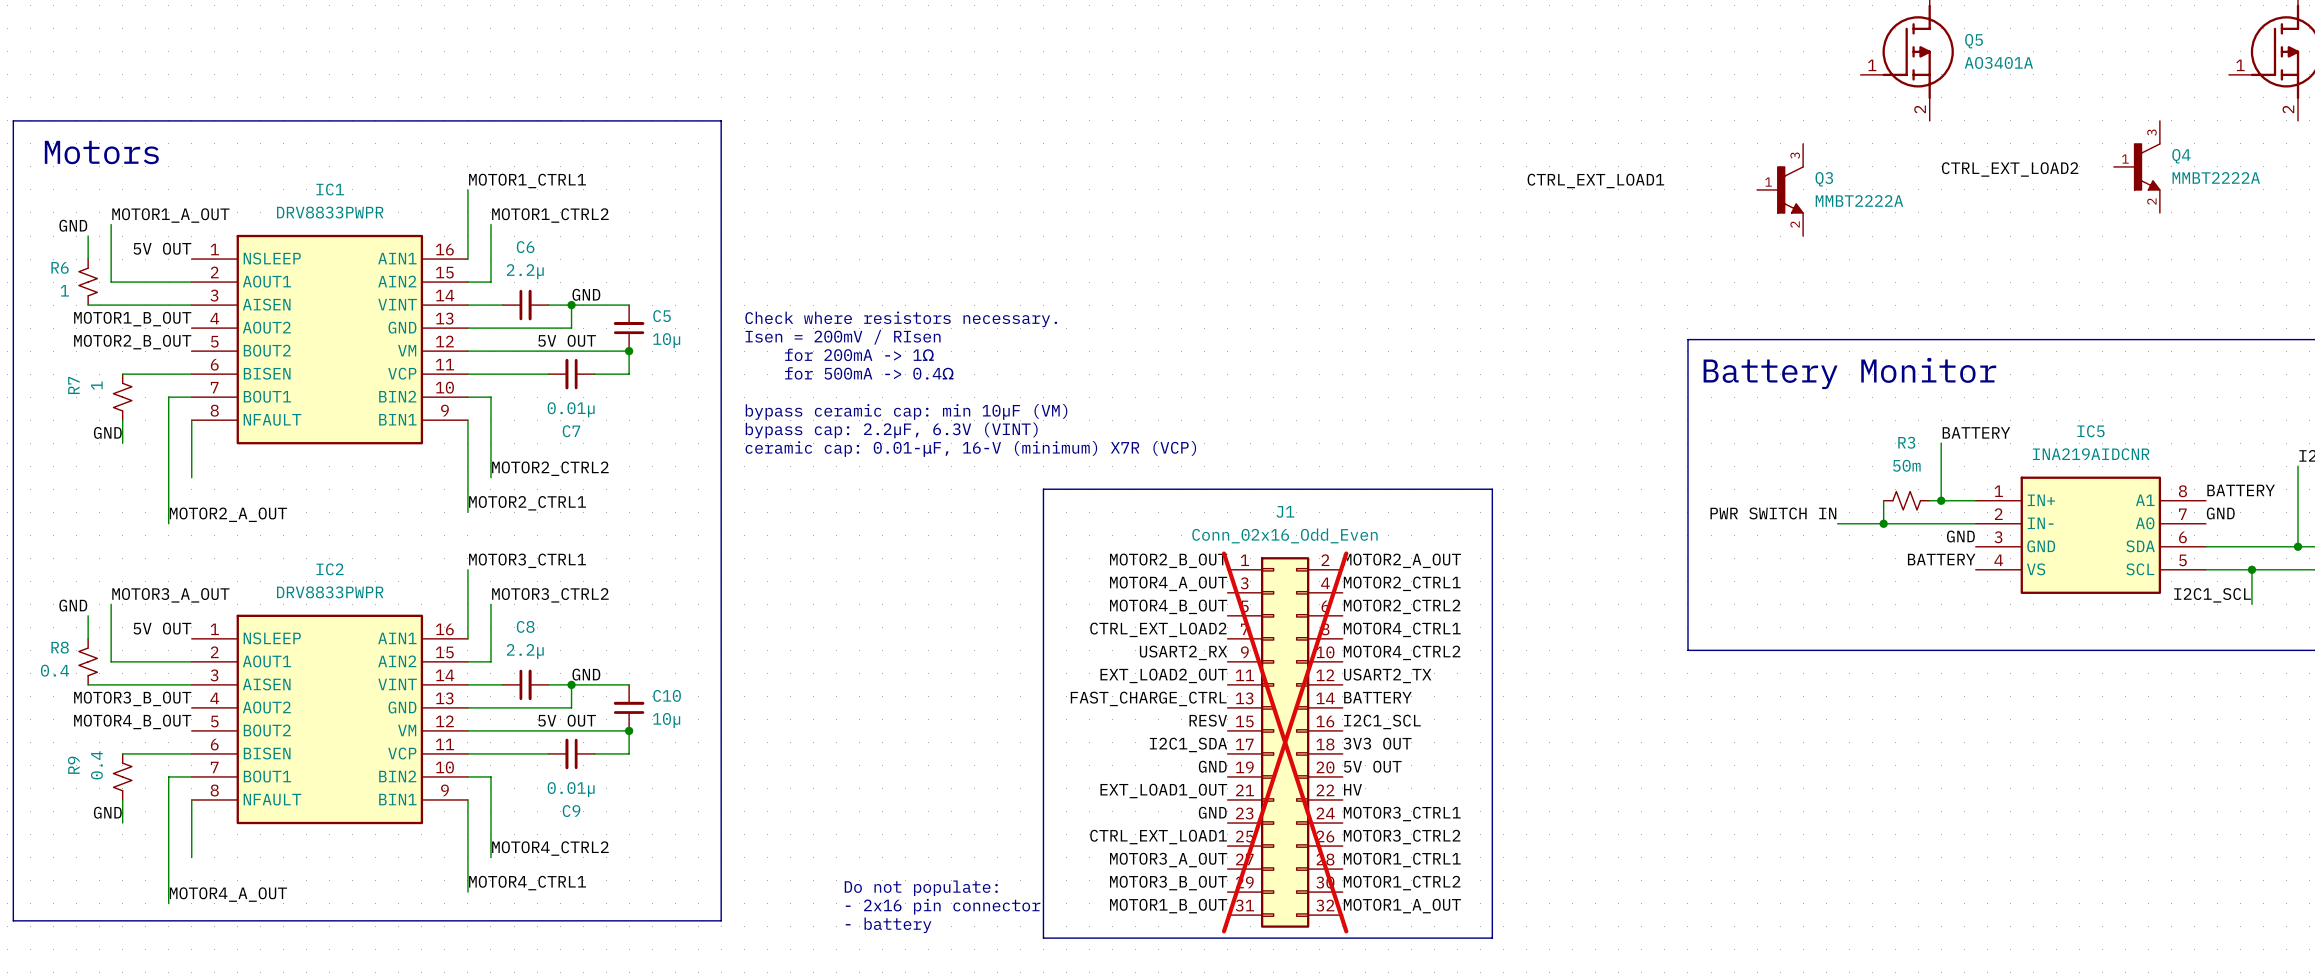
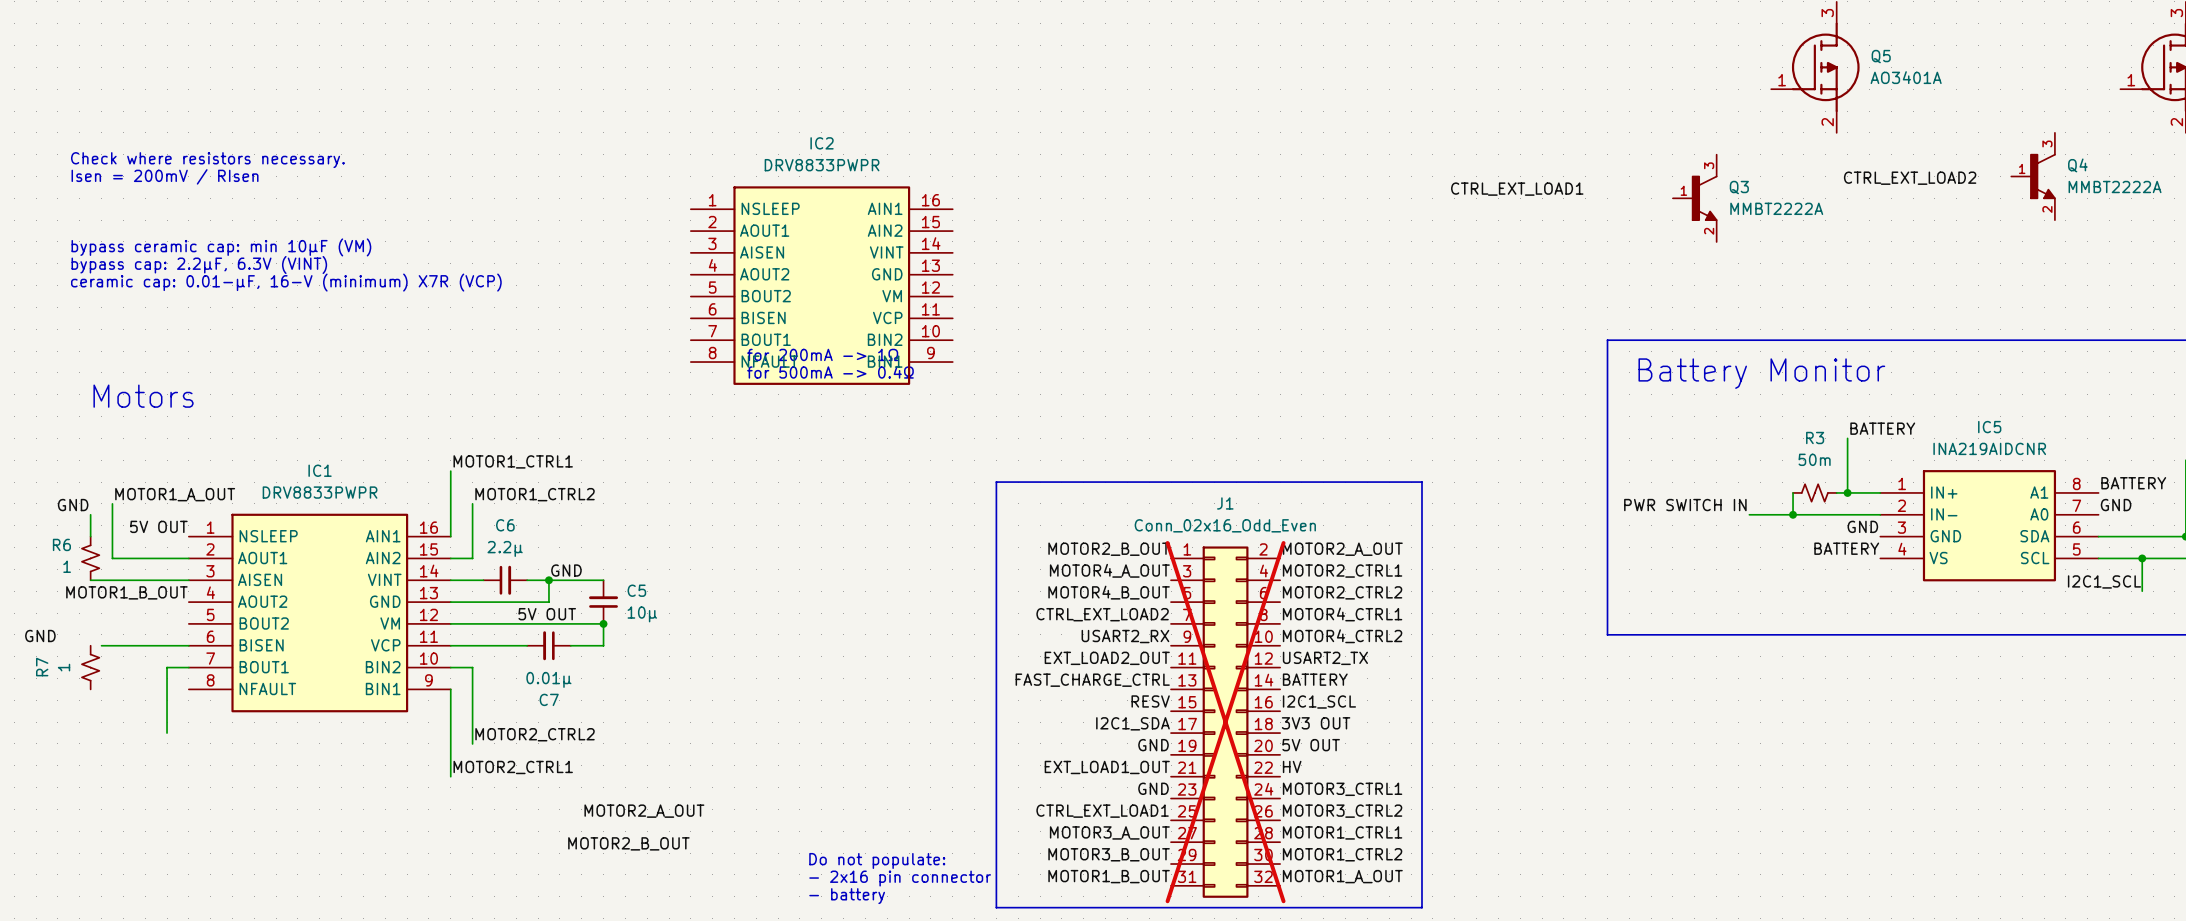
line: (13, 120) (721, 120) (721, 920) (13, 920) (13, 120) -> none
text: none -> Check where resistors necessary. (207, 160)
text: Motors (101, 152) -> none
text: none -> Isen = 200mV / RIsen (165, 176)
label: MOTOR1_CTRL1 (527, 181) -> none
wire: (467, 189) (467, 259) -> none
label: MOTOR1_A_OUT (170, 215) -> none
label: MOTOR1_CTRL2 (550, 215) -> none
wire: (111, 224) (111, 282) (191, 282) -> none
wire: (490, 224) (490, 282) (467, 282) -> none
label: GND (73, 225) -> none
wire: (88, 236) (88, 259) -> none
text: none -> bypass ceramic cap: min 10µF (VM) (221, 247)
label: 5V OUT (162, 248) -> none
text: none -> bypass cap: 2.2µF, 6.3V (VINT) (199, 265)
text: none -> ceramic cap: 0.01-μF, 16-V (minimum) X7R (VCP) (286, 282)
R6 position: (88, 282) -> (90, 558)
label: GND (586, 294) -> none
wire: (88, 305) (191, 305) -> none
wire: (467, 305) (502, 305) -> none
C6 position: (525, 305) -> (505, 580)
wire: (548, 305) (629, 305) -> none
wire: (571, 305) (571, 328) (467, 328) -> none
junction: (571, 305) -> none
label: MOTOR1_B_OUT (132, 319) -> none
text: Check where resistors necessary. (901, 319) -> none
C5 position: (629, 328) -> (603, 602)
text: Isen = 200mV / RIsen (843, 337) -> none
IC1 position: (329, 339) -> (319, 613)
label: 5V OUT (567, 340) -> none
label: MOTOR2_B_OUT (132, 342) -> none
wire: (467, 351) (629, 351) (629, 374) (594, 374) -> none
junction: (629, 351) -> none
wire: (122, 374) (191, 374) -> none
wire: (467, 374) (548, 374) -> none
C7 position: (571, 374) -> (548, 645)
R7 name position: R7 (73, 385) -> R7 (42, 667)
R7 value position: 1 (96, 385) -> 1 (64, 667)
R7 position: (122, 397) -> (90, 667)
wire: (191, 397) (168, 397) (168, 523) -> none
wire: (467, 397) (490, 397) (490, 477) -> none
text: none -> Motors (143, 396)
text: bypass ceramic cap: min 10µF (VM) (906, 411) -> none
wire: (122, 420) (122, 443) -> none
wire: (191, 420) (191, 477) -> none
wire: (467, 420) (467, 477) -> none
text: bypass cap: 2.2µF, 6.3V (VINT) (891, 430) -> none
label: GND (107, 432) -> none
text: ceramic cap: 0.01-μF, 16-V (minimum) X7R (VCP) (970, 448) -> none
label: MOTOR2_CTRL2 (550, 468) -> MOTOR1_CTRL1 (513, 461)
label: MOTOR2_CTRL1 (527, 503) -> MOTOR1_CTRL2 (535, 494)
wire: none -> (112, 503) (112, 558) (188, 558)
wire: none -> (450, 503) (450, 536)
label: none -> GND (73, 505)
label: MOTOR2_A_OUT (228, 514) -> MOTOR1_A_OUT (175, 494)
label: MOTOR3_CTRL1 (527, 560) -> none
wire: (467, 569) (467, 638) -> (450, 558) (472, 558) (472, 503)
wire: none -> (90, 580) (188, 580)
wire: none -> (450, 580) (483, 580)
wire: none -> (548, 580) (548, 602) (450, 602)
junction: none -> (548, 580)
label: MOTOR3_A_OUT (170, 595) -> MOTOR1_B_OUT (126, 592)
label: MOTOR3_CTRL2 (550, 595) -> none
wire: (111, 604) (111, 661) -> (101, 645) (112, 645)
wire: (490, 604) (490, 661) -> (527, 645) (472, 645)
label: GND (73, 605) -> none
wire: (88, 615) (88, 638) -> (90, 514) (90, 536)
label position: 5V OUT (162, 628) -> 5V OUT (158, 526)
junction: none -> (603, 623)
label: none -> GND (40, 636)
R8: 0.4 (88, 661) -> none
label position: GND (586, 674) -> GND (566, 570)
wire: (88, 684) (168, 684) -> (167, 733) (167, 667)
wire: (490, 684) (502, 684) -> (472, 667) (472, 743)
C8: 2.2µ (525, 684) -> none
wire: (548, 684) (629, 684) -> (527, 580) (603, 580)
wire: (571, 684) (571, 707) (467, 707) -> (450, 776) (450, 689)
junction: (571, 684) -> none
label: MOTOR3_B_OUT (132, 698) -> none
C10: 10µ (629, 707) -> none
IC2 position: (329, 719) -> (821, 285)
label position: 5V OUT (567, 720) -> 5V OUT (547, 614)
label: MOTOR4_B_OUT (132, 721) -> none
wire: (467, 730) (629, 730) (629, 753) (594, 753) -> (450, 623) (603, 623) (603, 645) (570, 645)
junction: (629, 730) -> none
wire: (122, 753) (191, 753) -> none
wire: (467, 753) (548, 753) -> none
C9: 0.01µ (571, 753) -> none
label: none -> MOTOR2_CTRL2 (535, 734)
R9: 0.4 (122, 776) -> none
wire: (191, 776) (168, 776) (168, 903) -> none
wire: (467, 776) (490, 776) (490, 857) -> none
label: none -> MOTOR2_CTRL1 (513, 767)
wire: (122, 799) (122, 823) -> none
wire: (191, 799) (191, 857) -> none
wire: (467, 799) (467, 892) -> none
label: GND (107, 812) -> none
label: none -> MOTOR2_A_OUT (644, 811)
label: MOTOR4_CTRL2 (550, 848) -> none
label: none -> MOTOR2_B_OUT (628, 843)
label: MOTOR4_CTRL1 (527, 883) -> none
label: MOTOR4_A_OUT (228, 894) -> none

